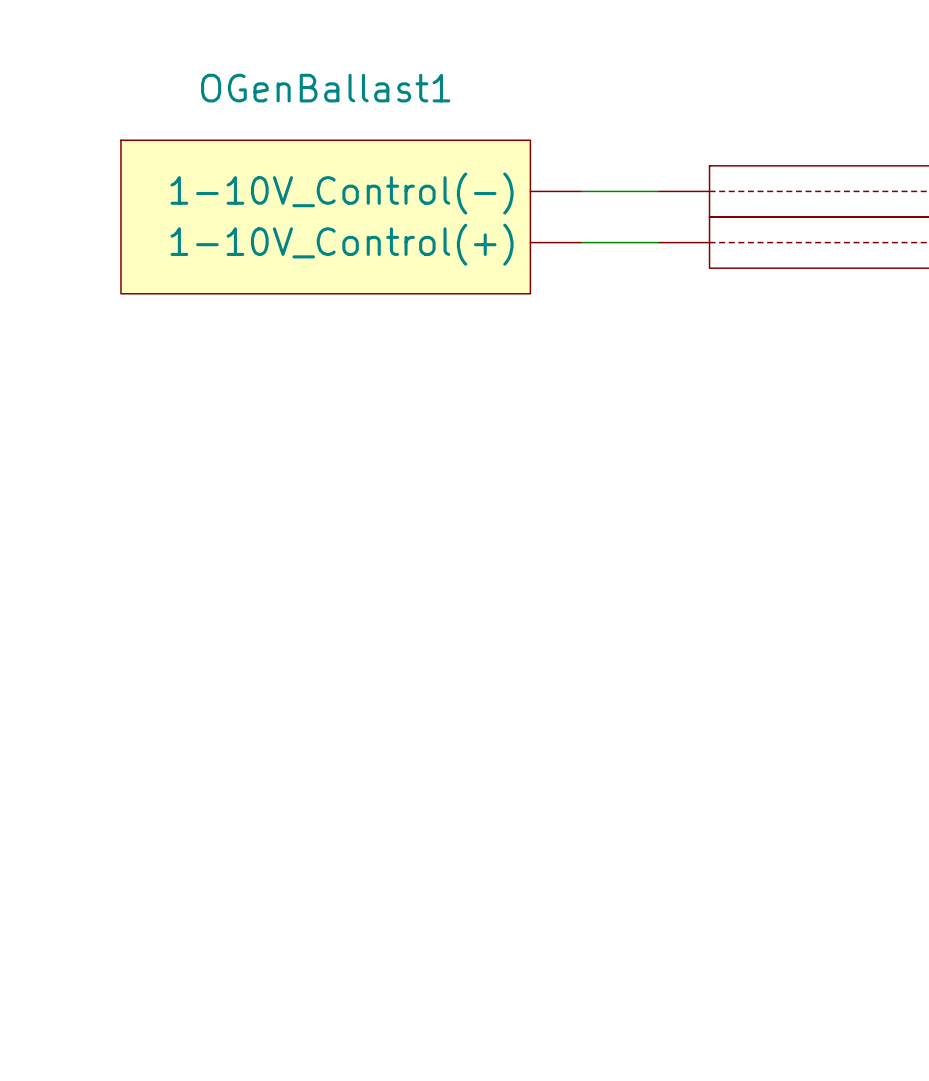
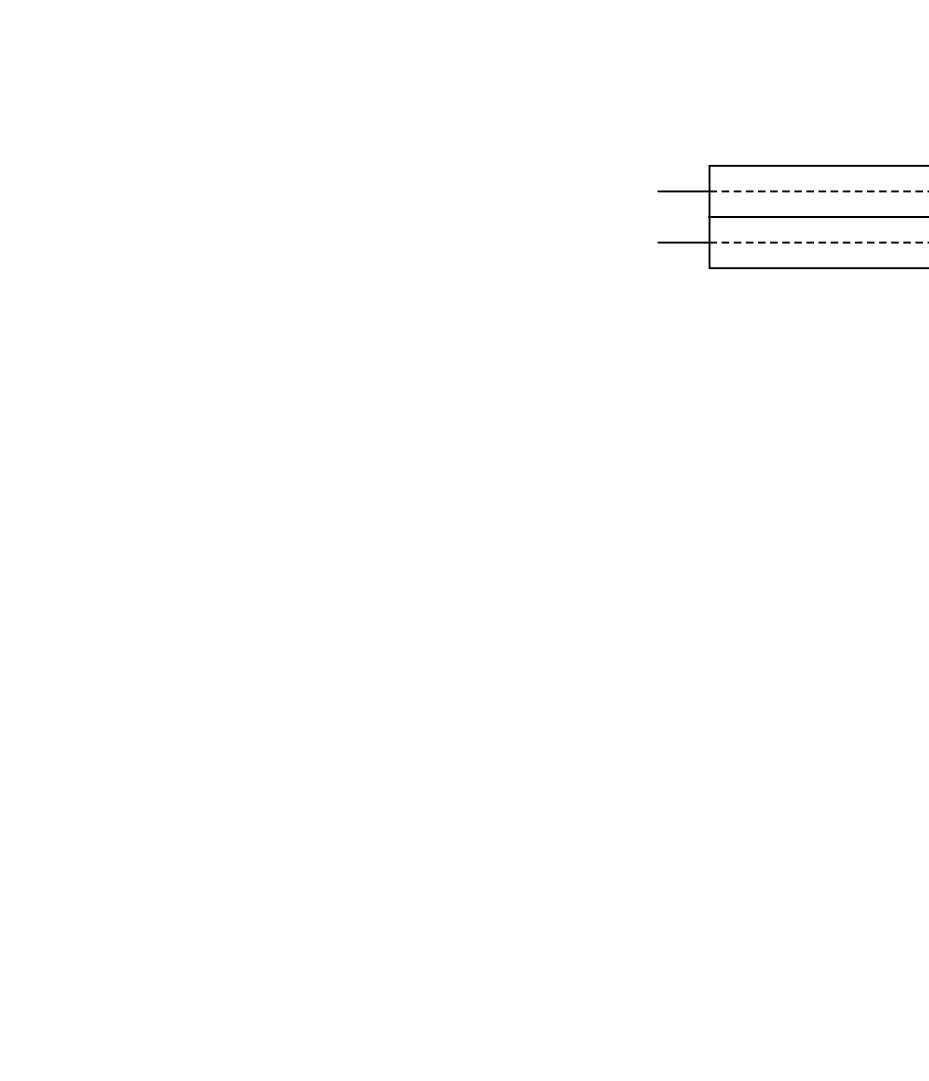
wire: (581, 191) (658, 191) -> none
OGenBallast1: (351, 217) -> none
wire: (581, 242) (658, 242) -> none

